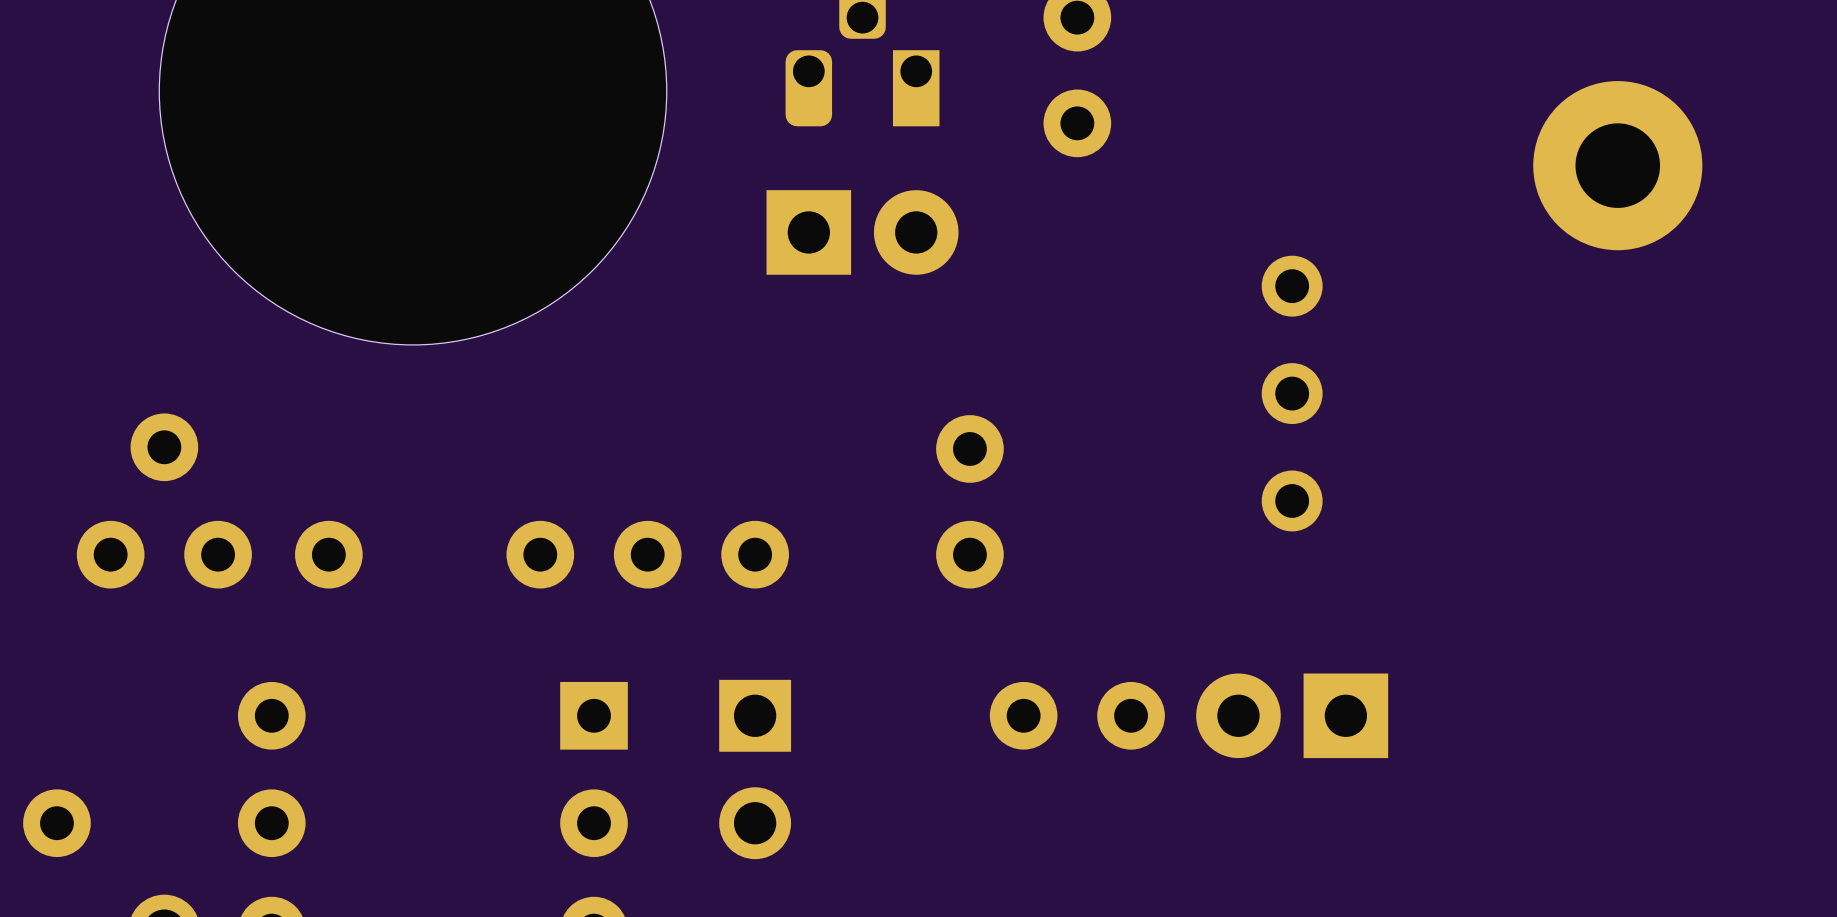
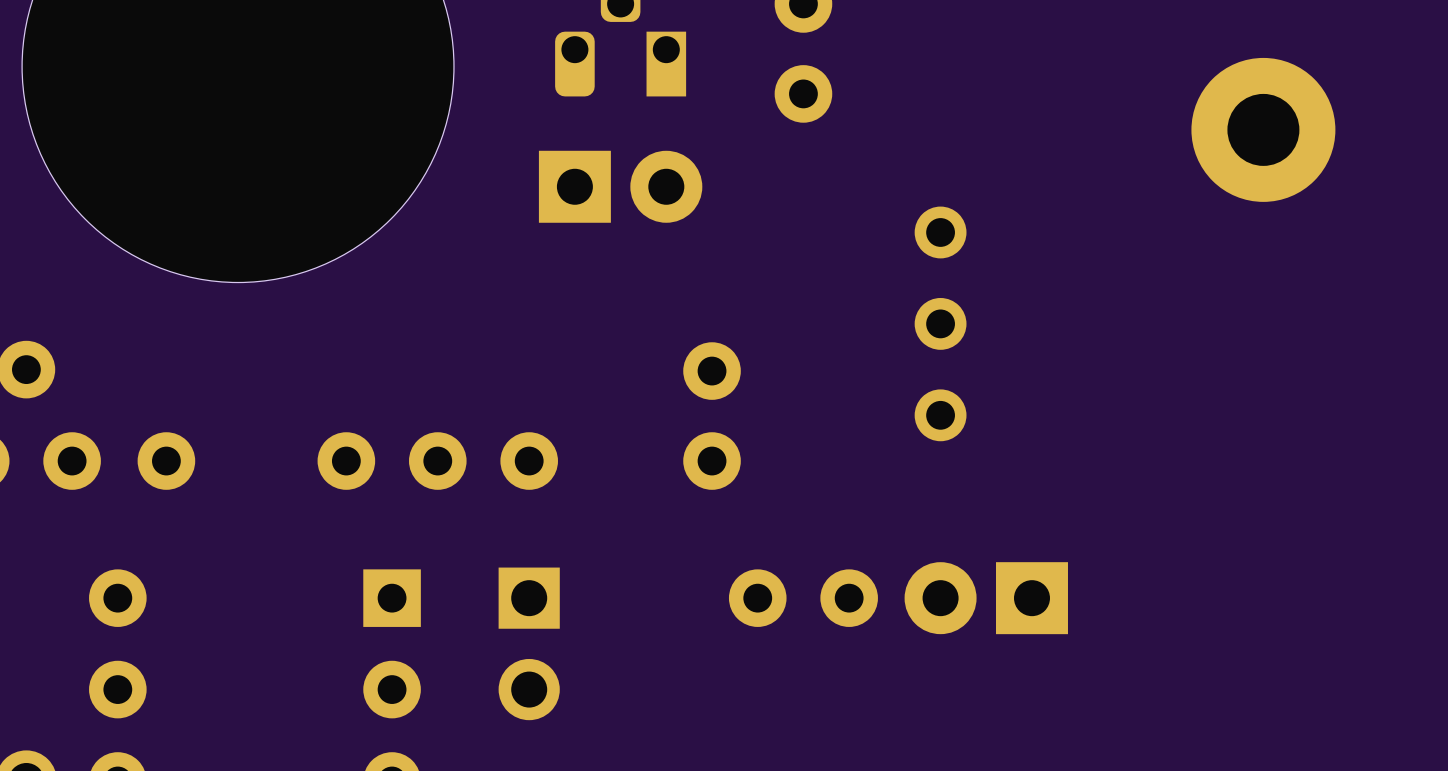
part position: (1292, 393) -> (940, 323)

